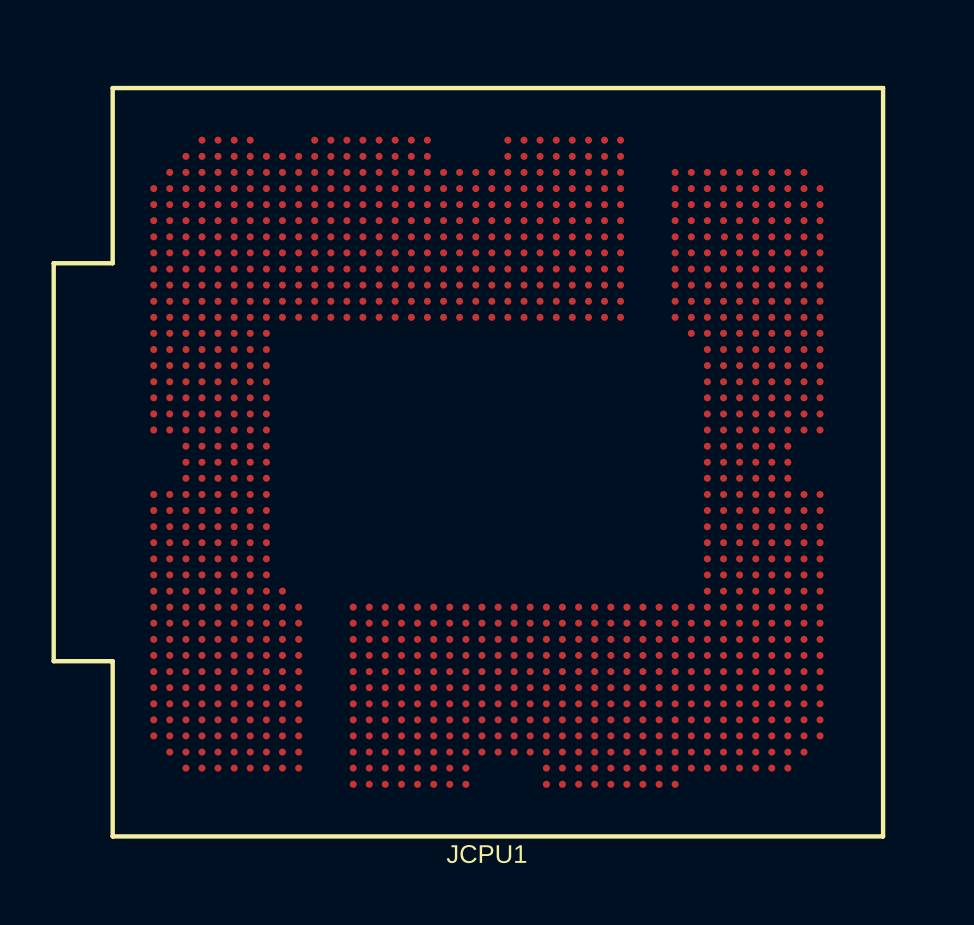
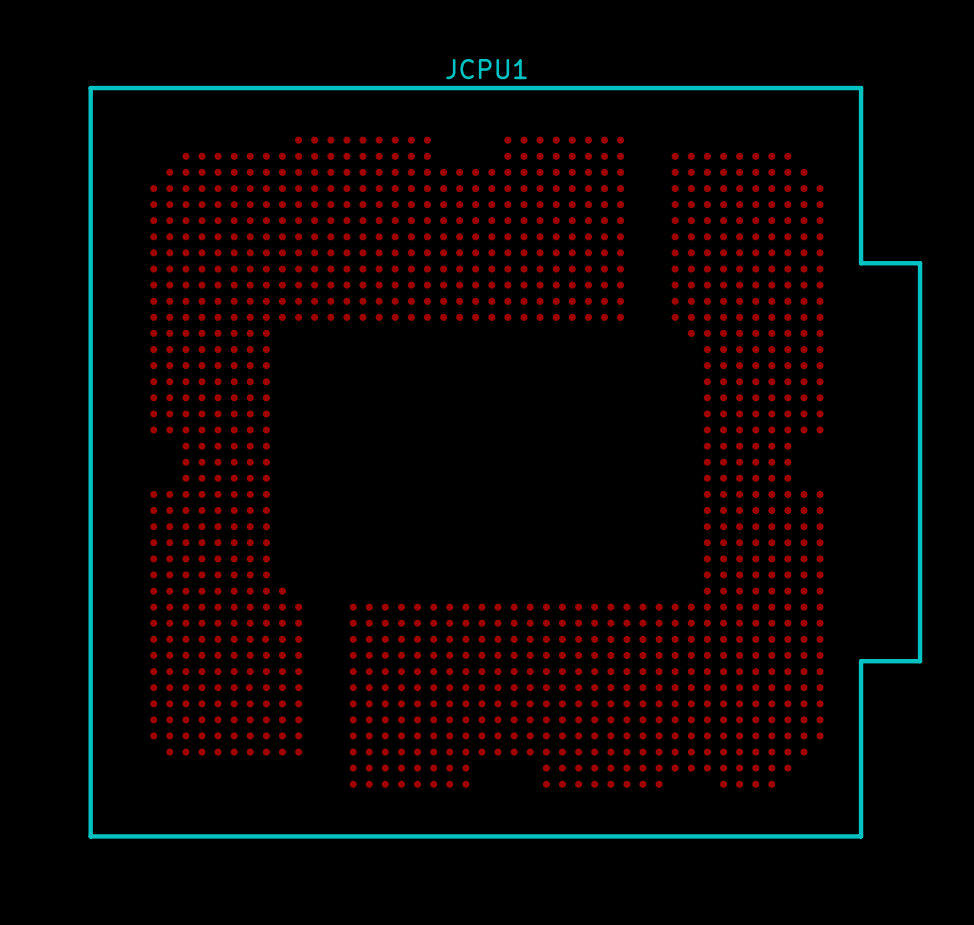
JCPU1 rotation: 0° (468, 462) -> 180° (505, 462)

